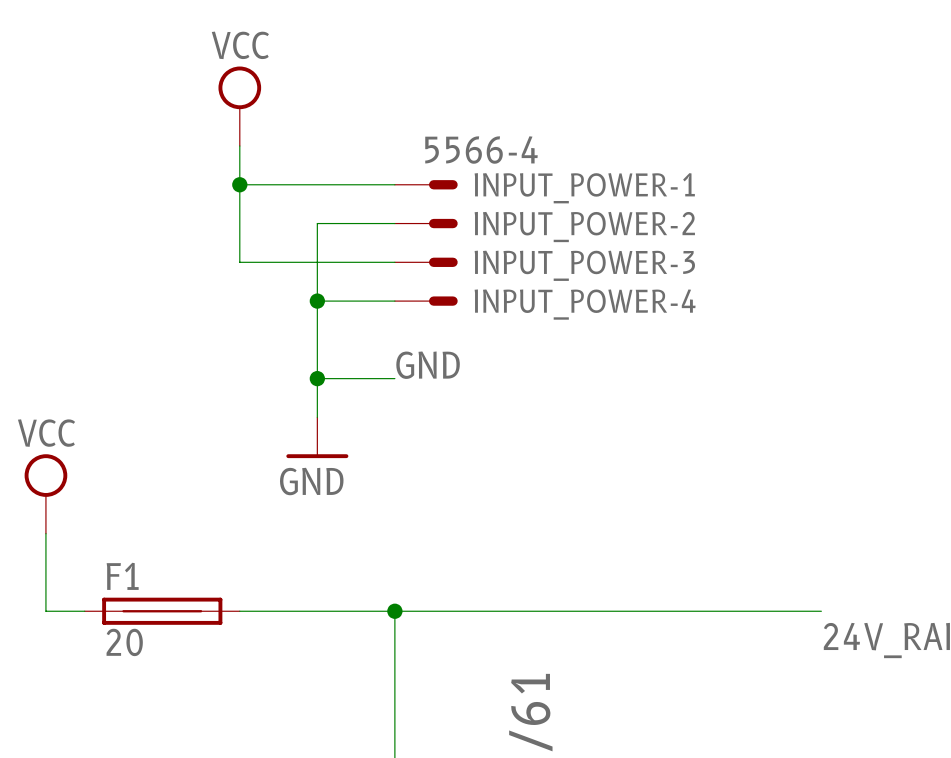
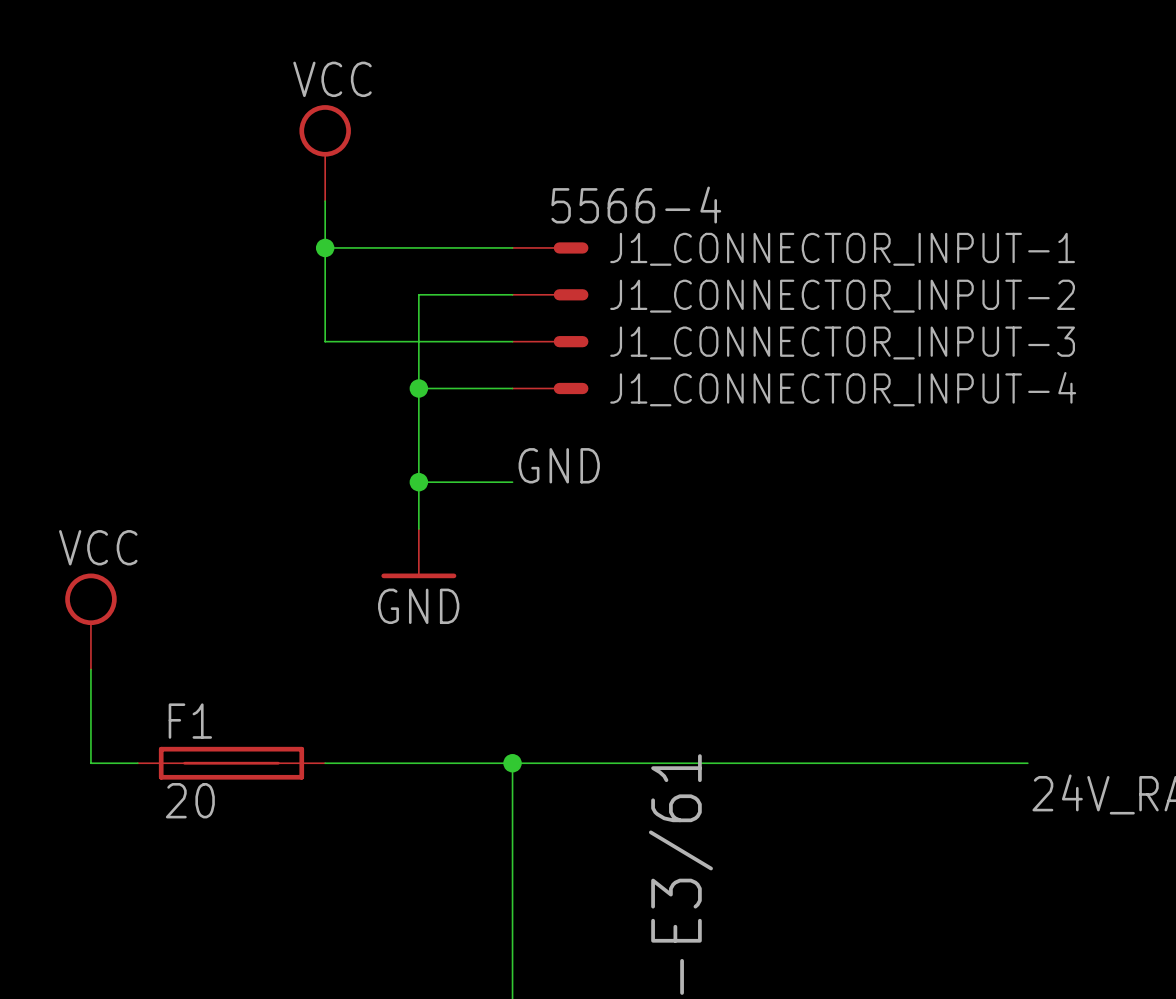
INPUT_POWER-1 name: INPUT_POWER-1 (584, 188) -> J1_CONNECTOR_INPUT-1 (842, 249)
INPUT_POWER-2 name: INPUT_POWER-2 (584, 227) -> J1_CONNECTOR_INPUT-2 (842, 296)
INPUT_POWER-3 name: INPUT_POWER-3 (584, 265) -> J1_CONNECTOR_INPUT-3 (842, 342)
INPUT_POWER-4 name: INPUT_POWER-4 (585, 304) -> J1_CONNECTOR_INPUT-4 (843, 389)

